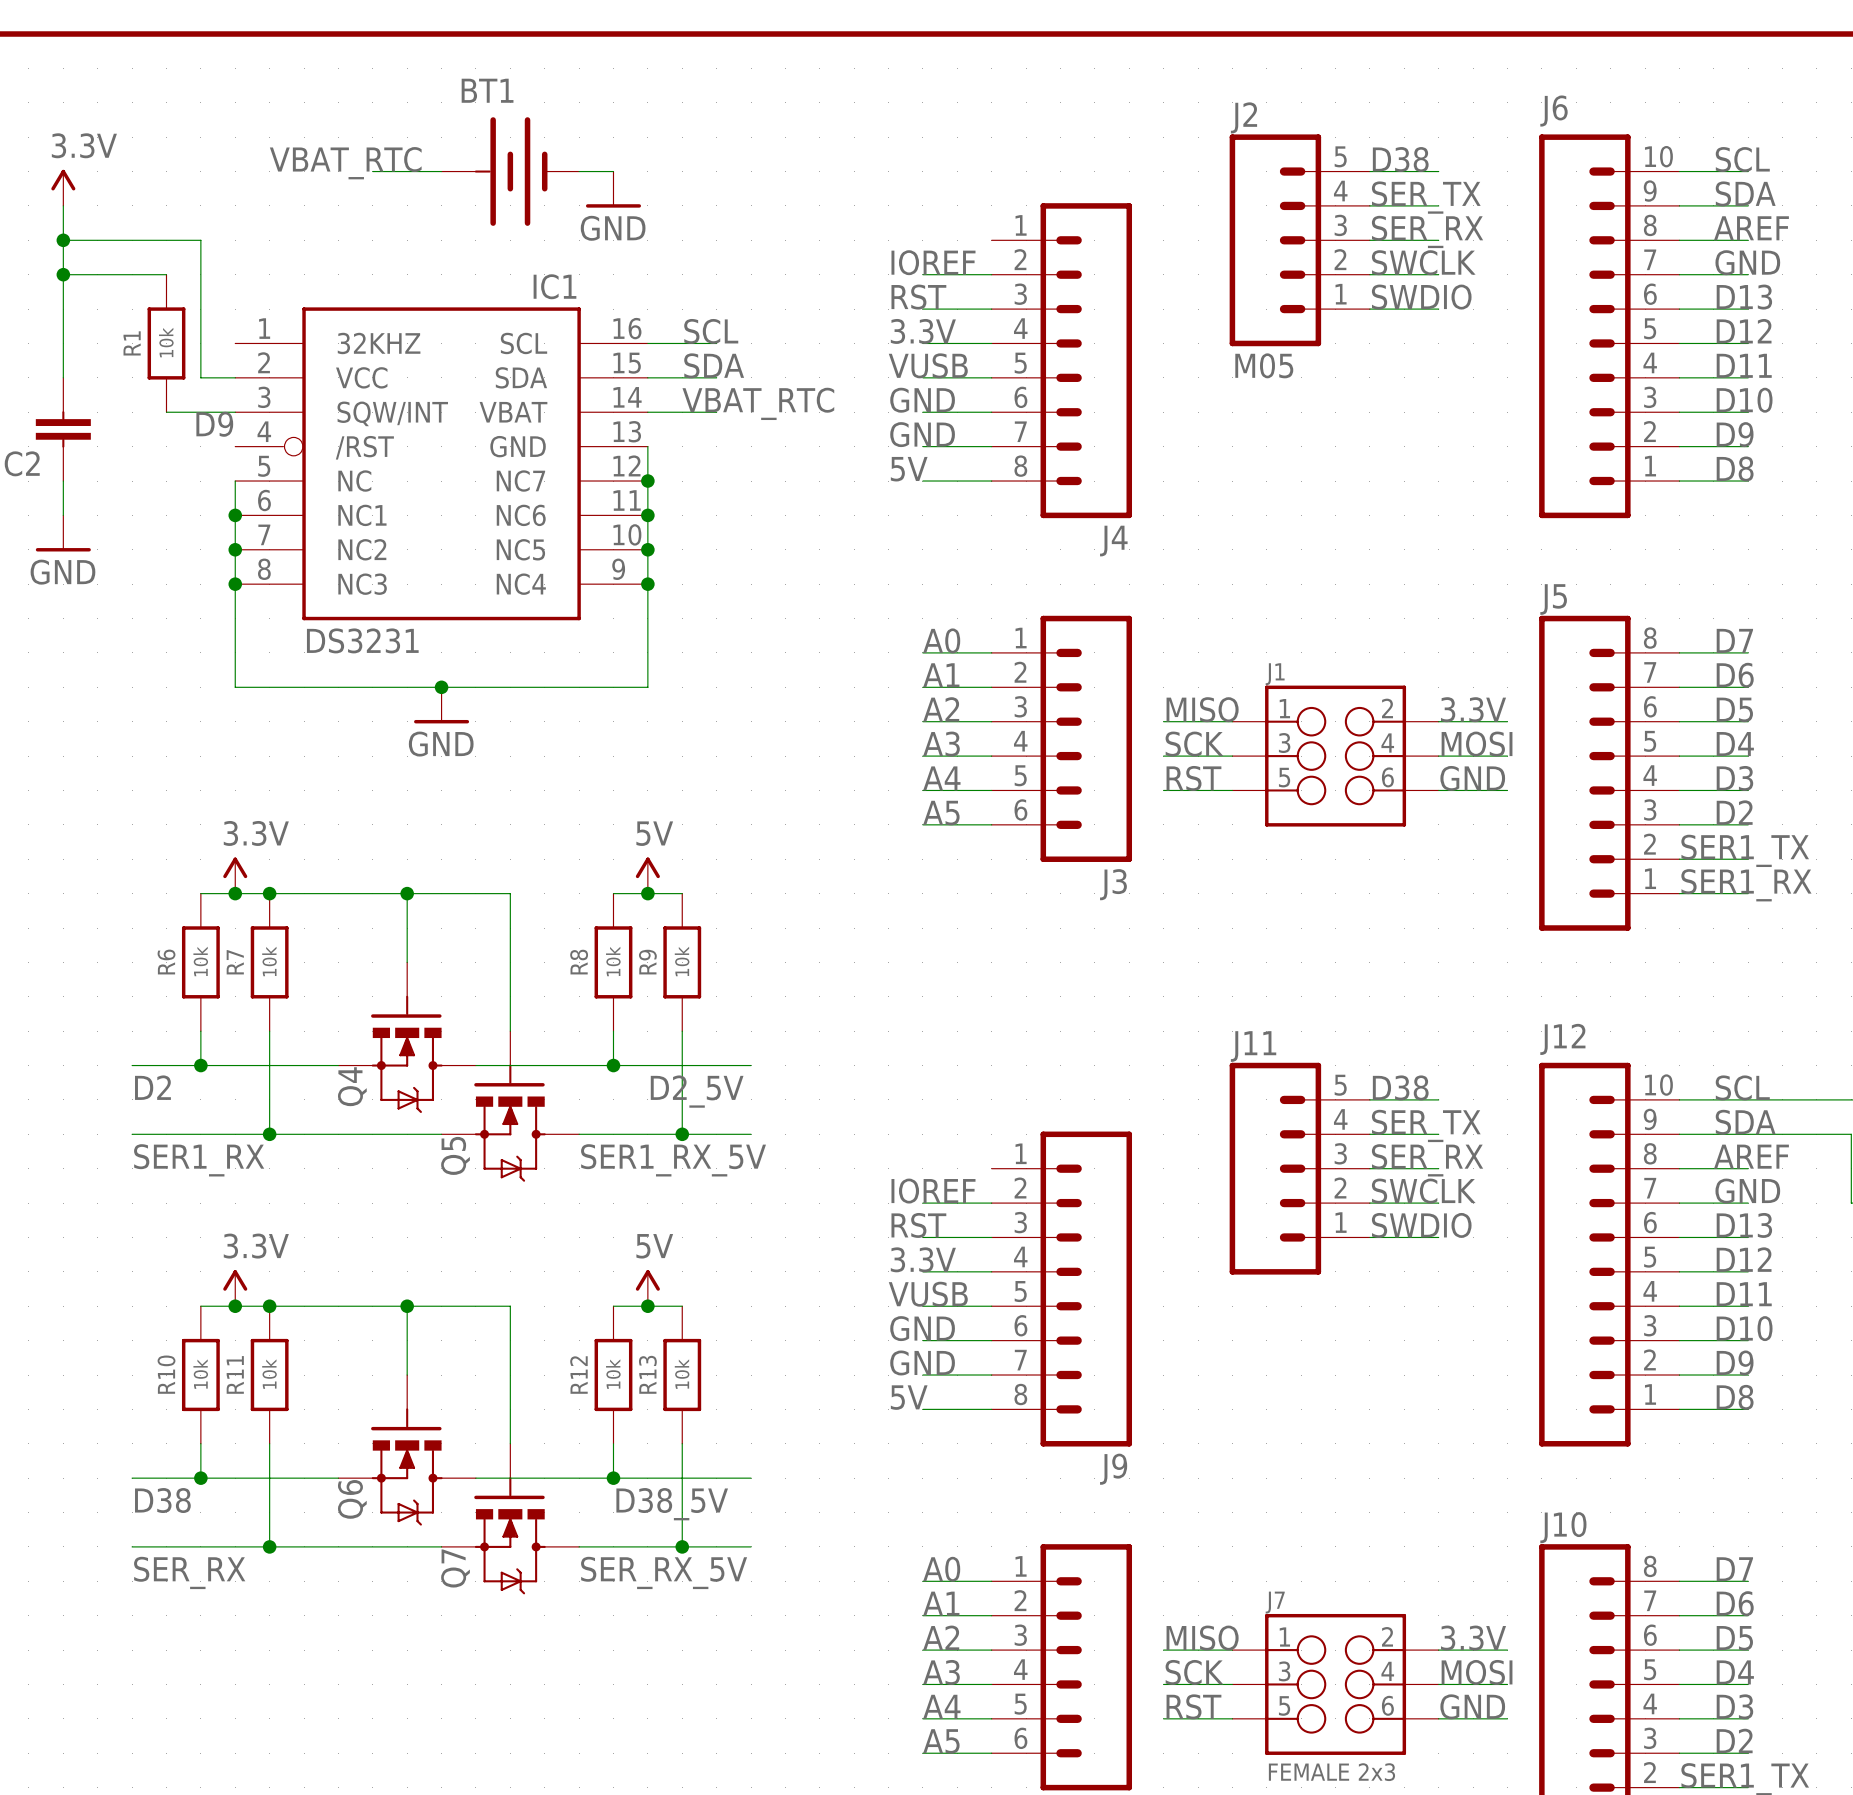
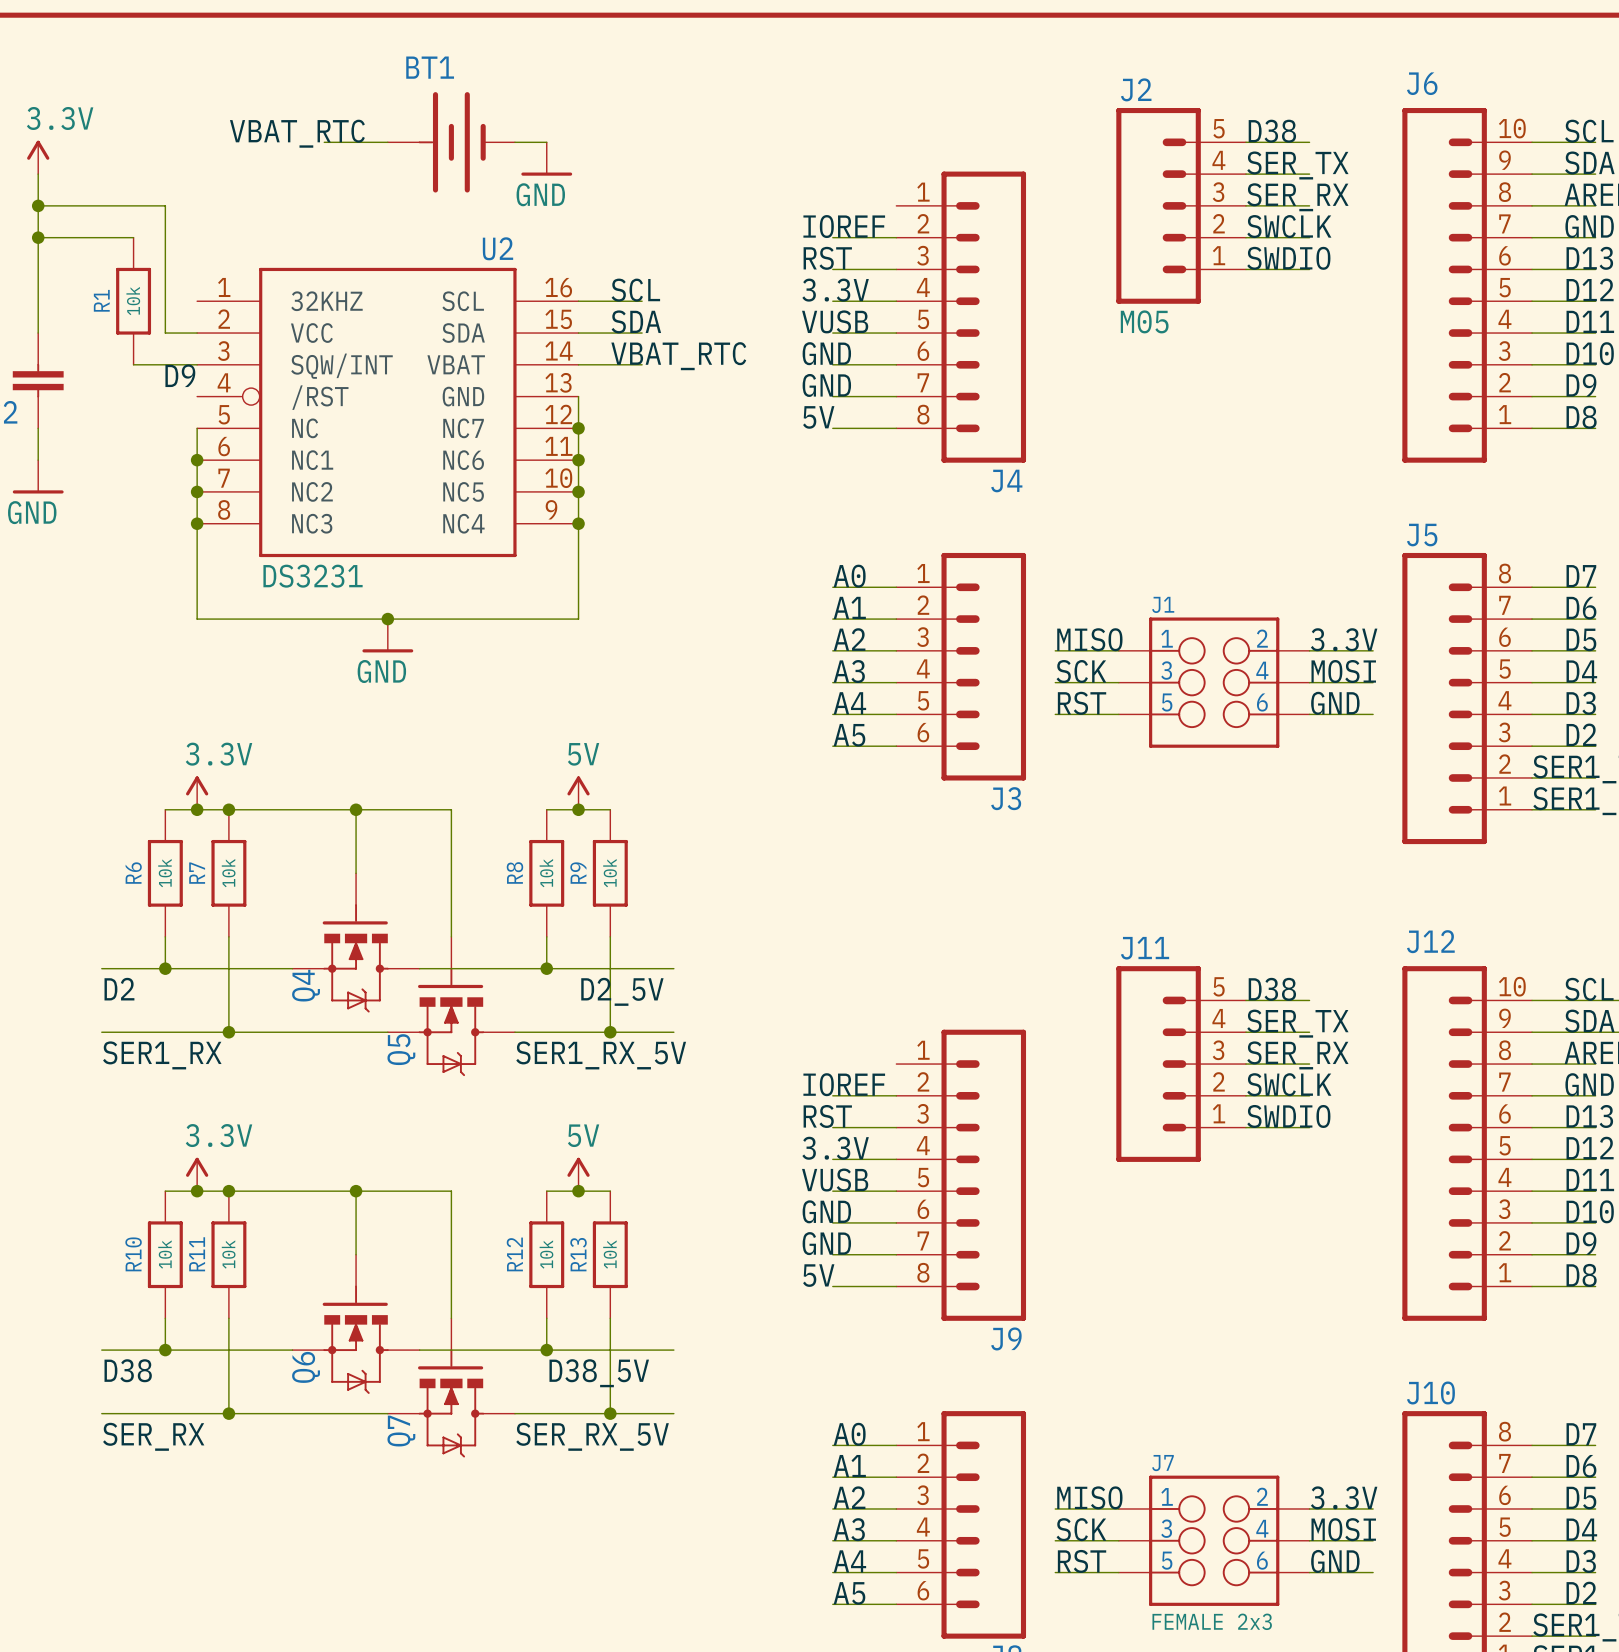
IC1 name: IC1 (554, 286) -> U2 (497, 248)

